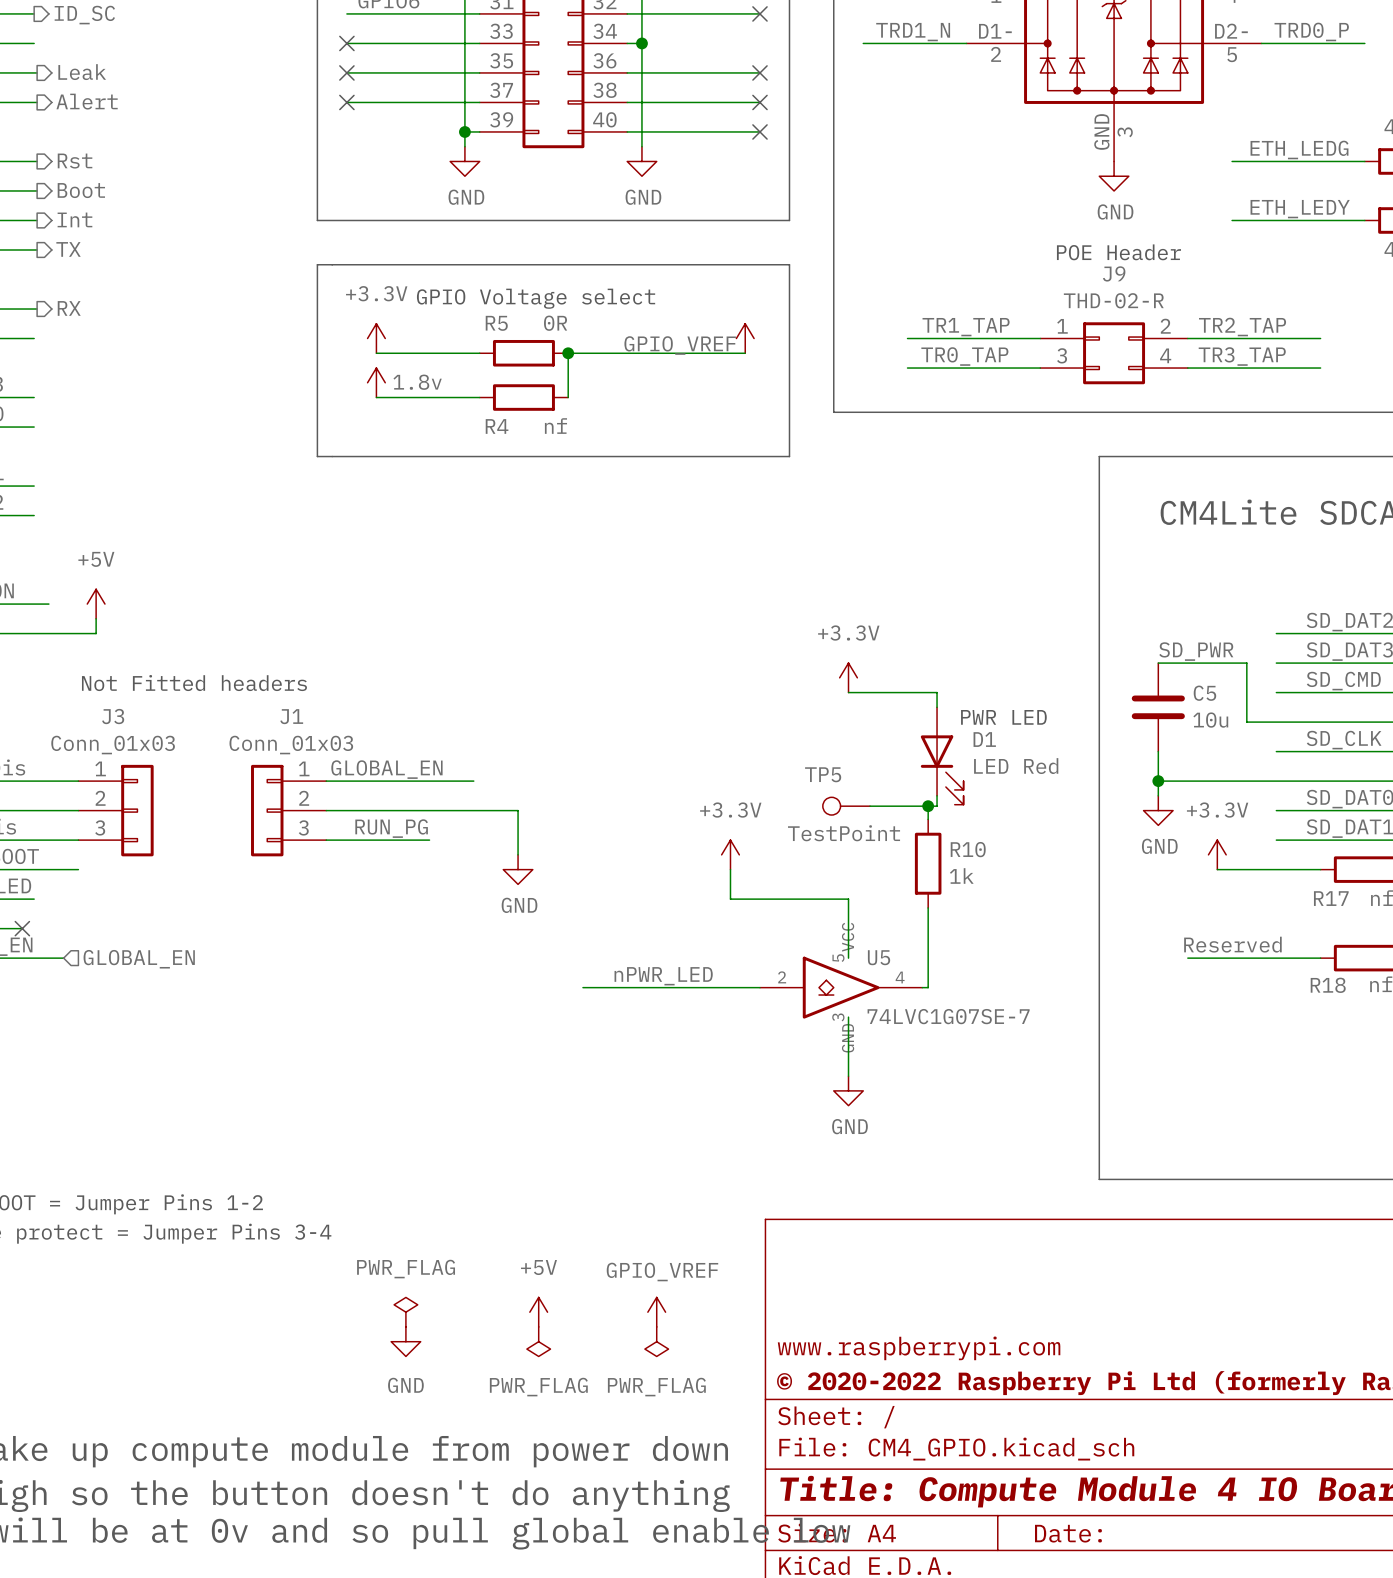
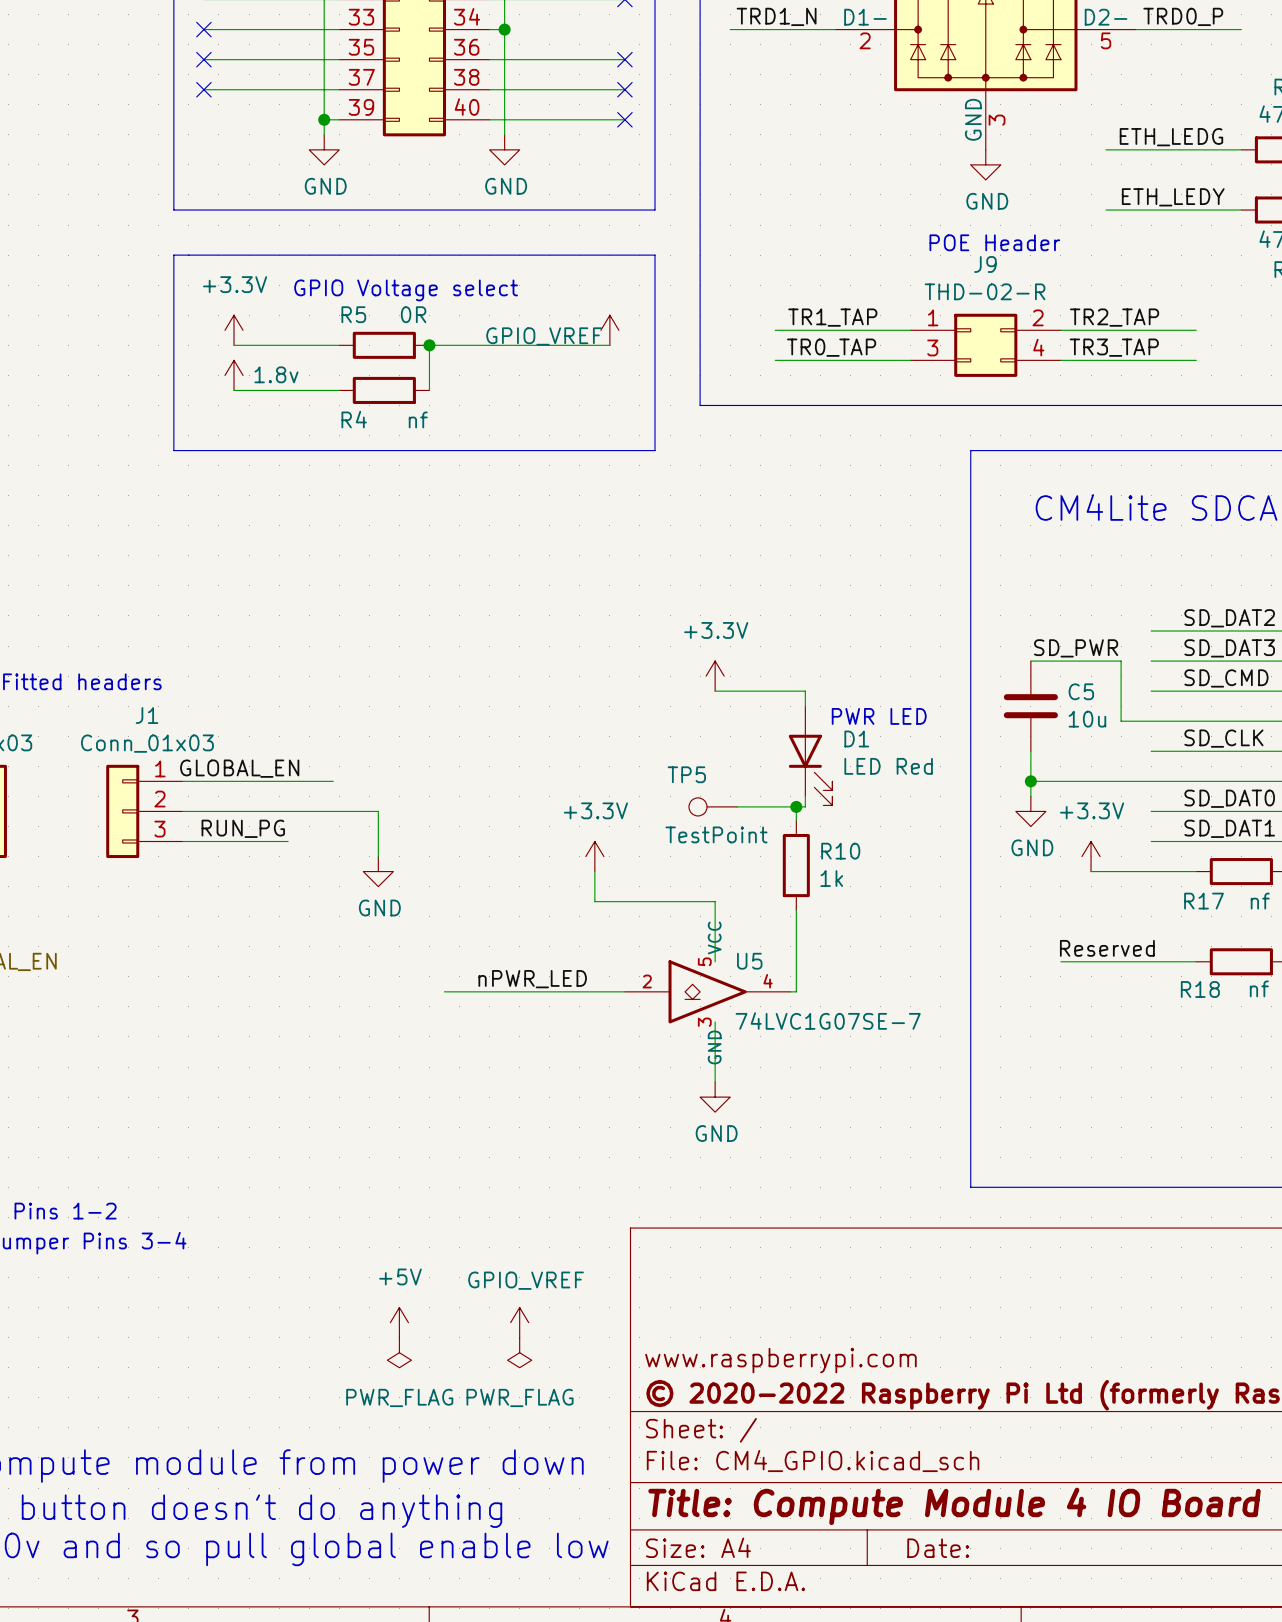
power symbol: PWR_FLAG (405, 1312) -> none
power symbol: GND (405, 1341) -> none

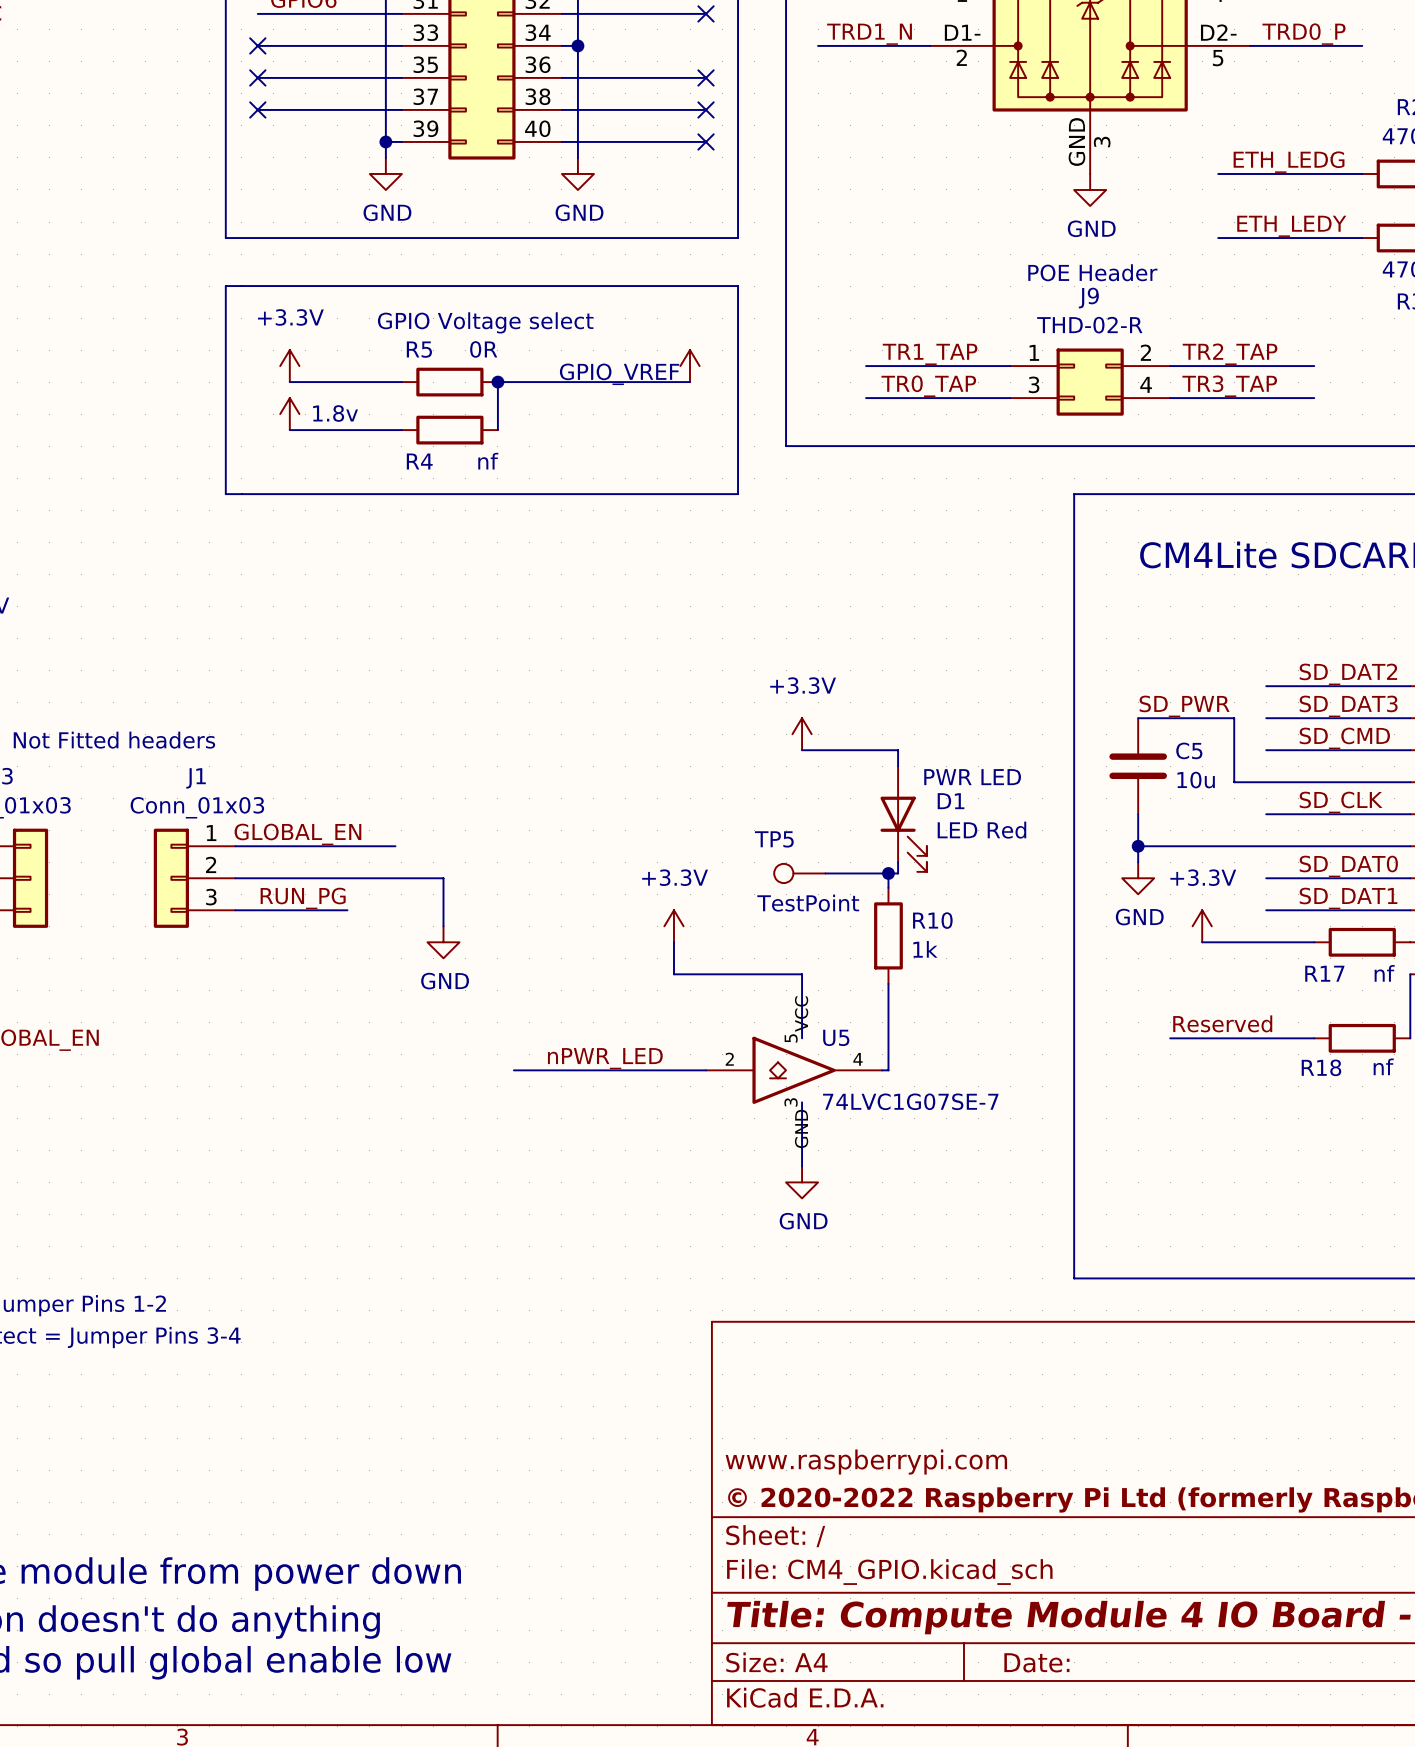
power symbol: +5V (399, 1322) -> none
power symbol: GPIO_VREF (519, 1322) -> none
power symbol: PWR_FLAG (399, 1352) -> none
power symbol: PWR_FLAG (519, 1352) -> none

